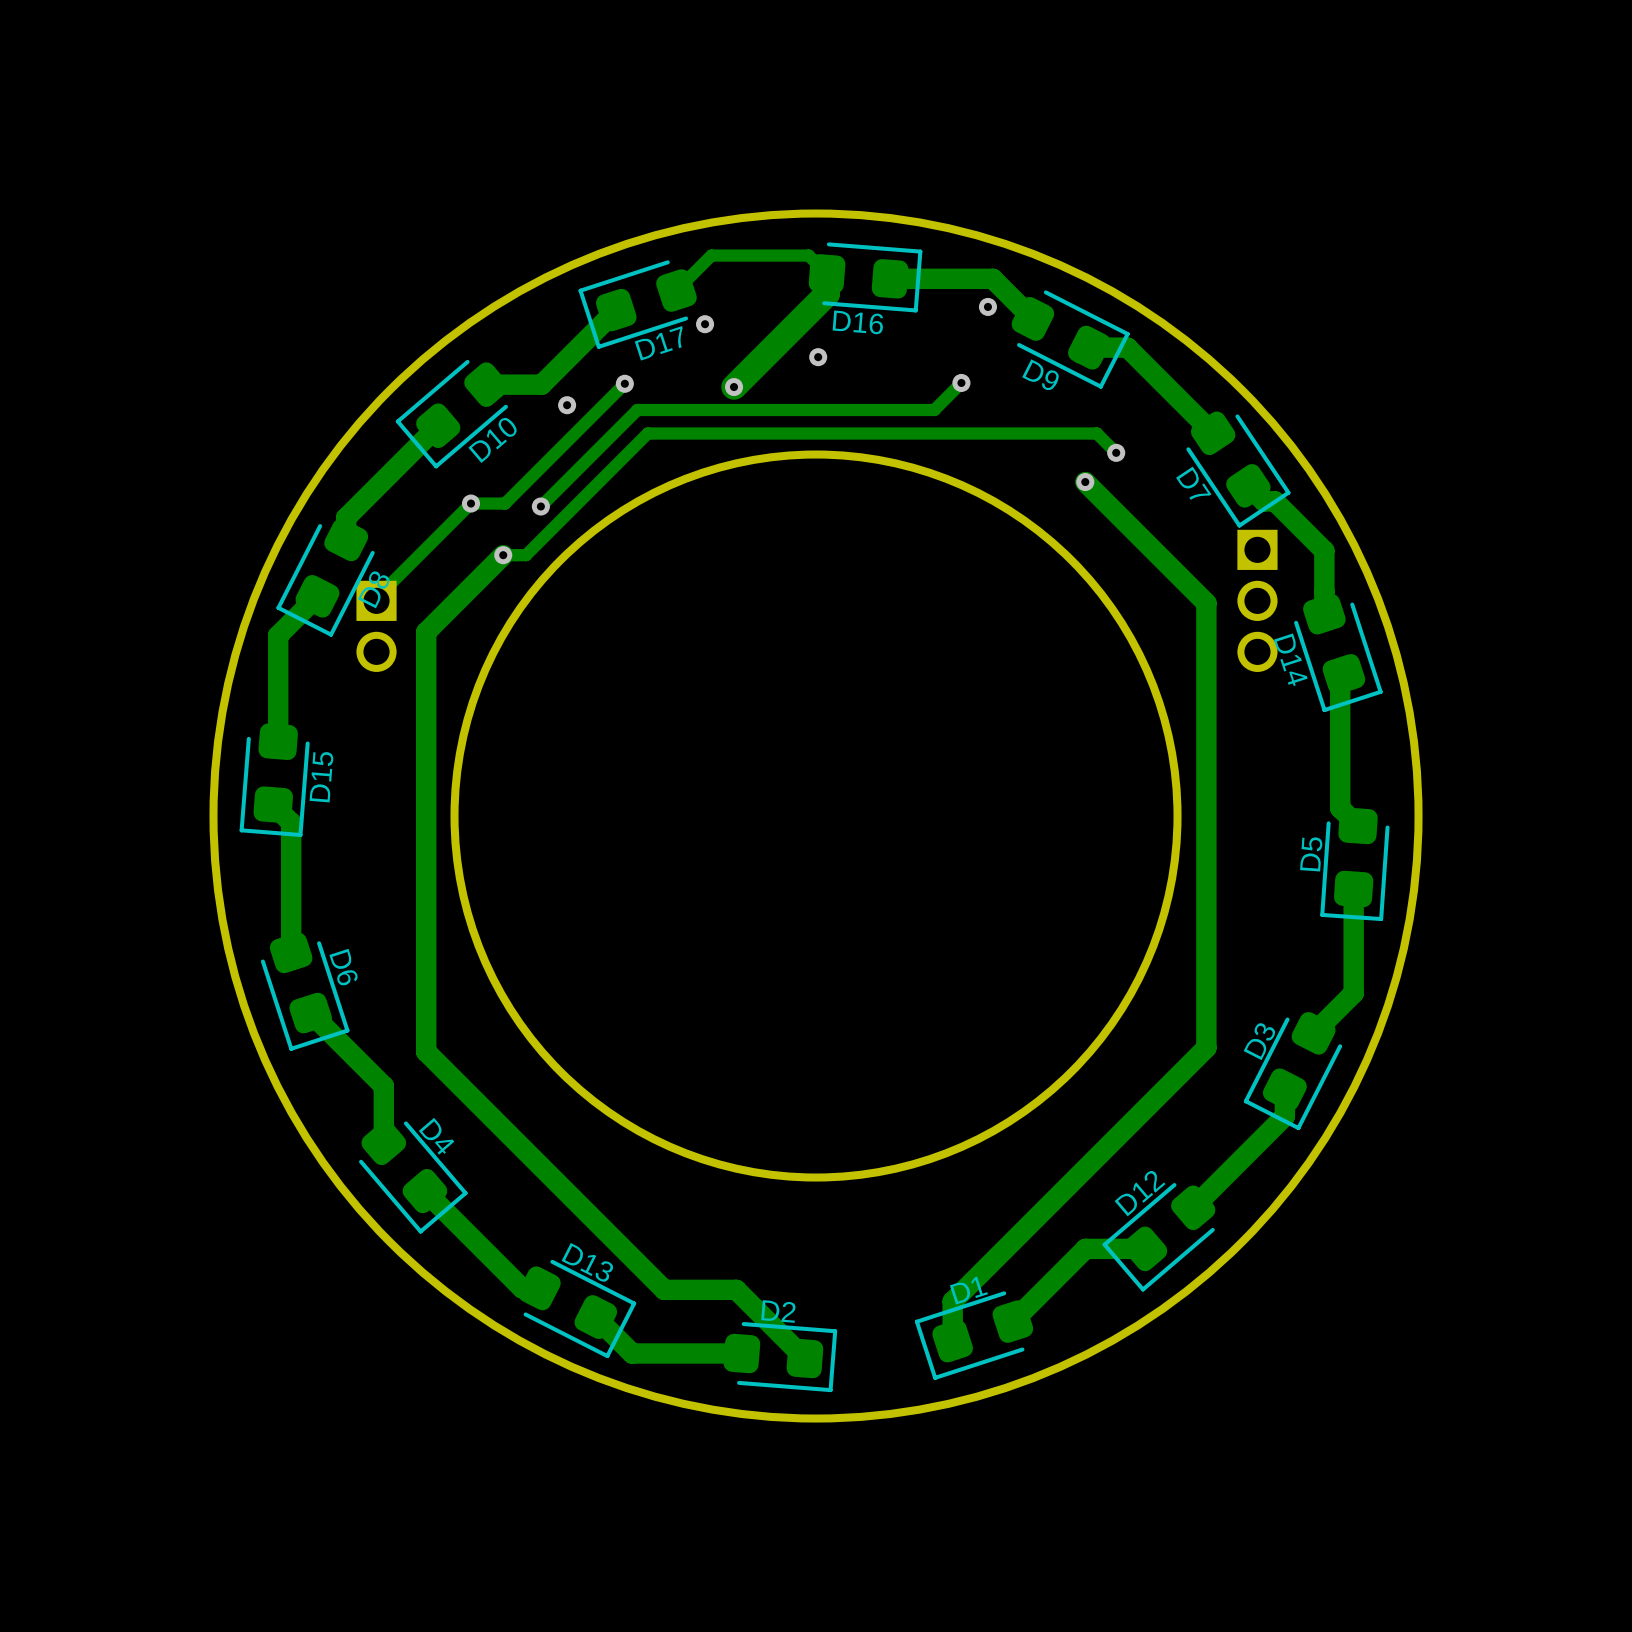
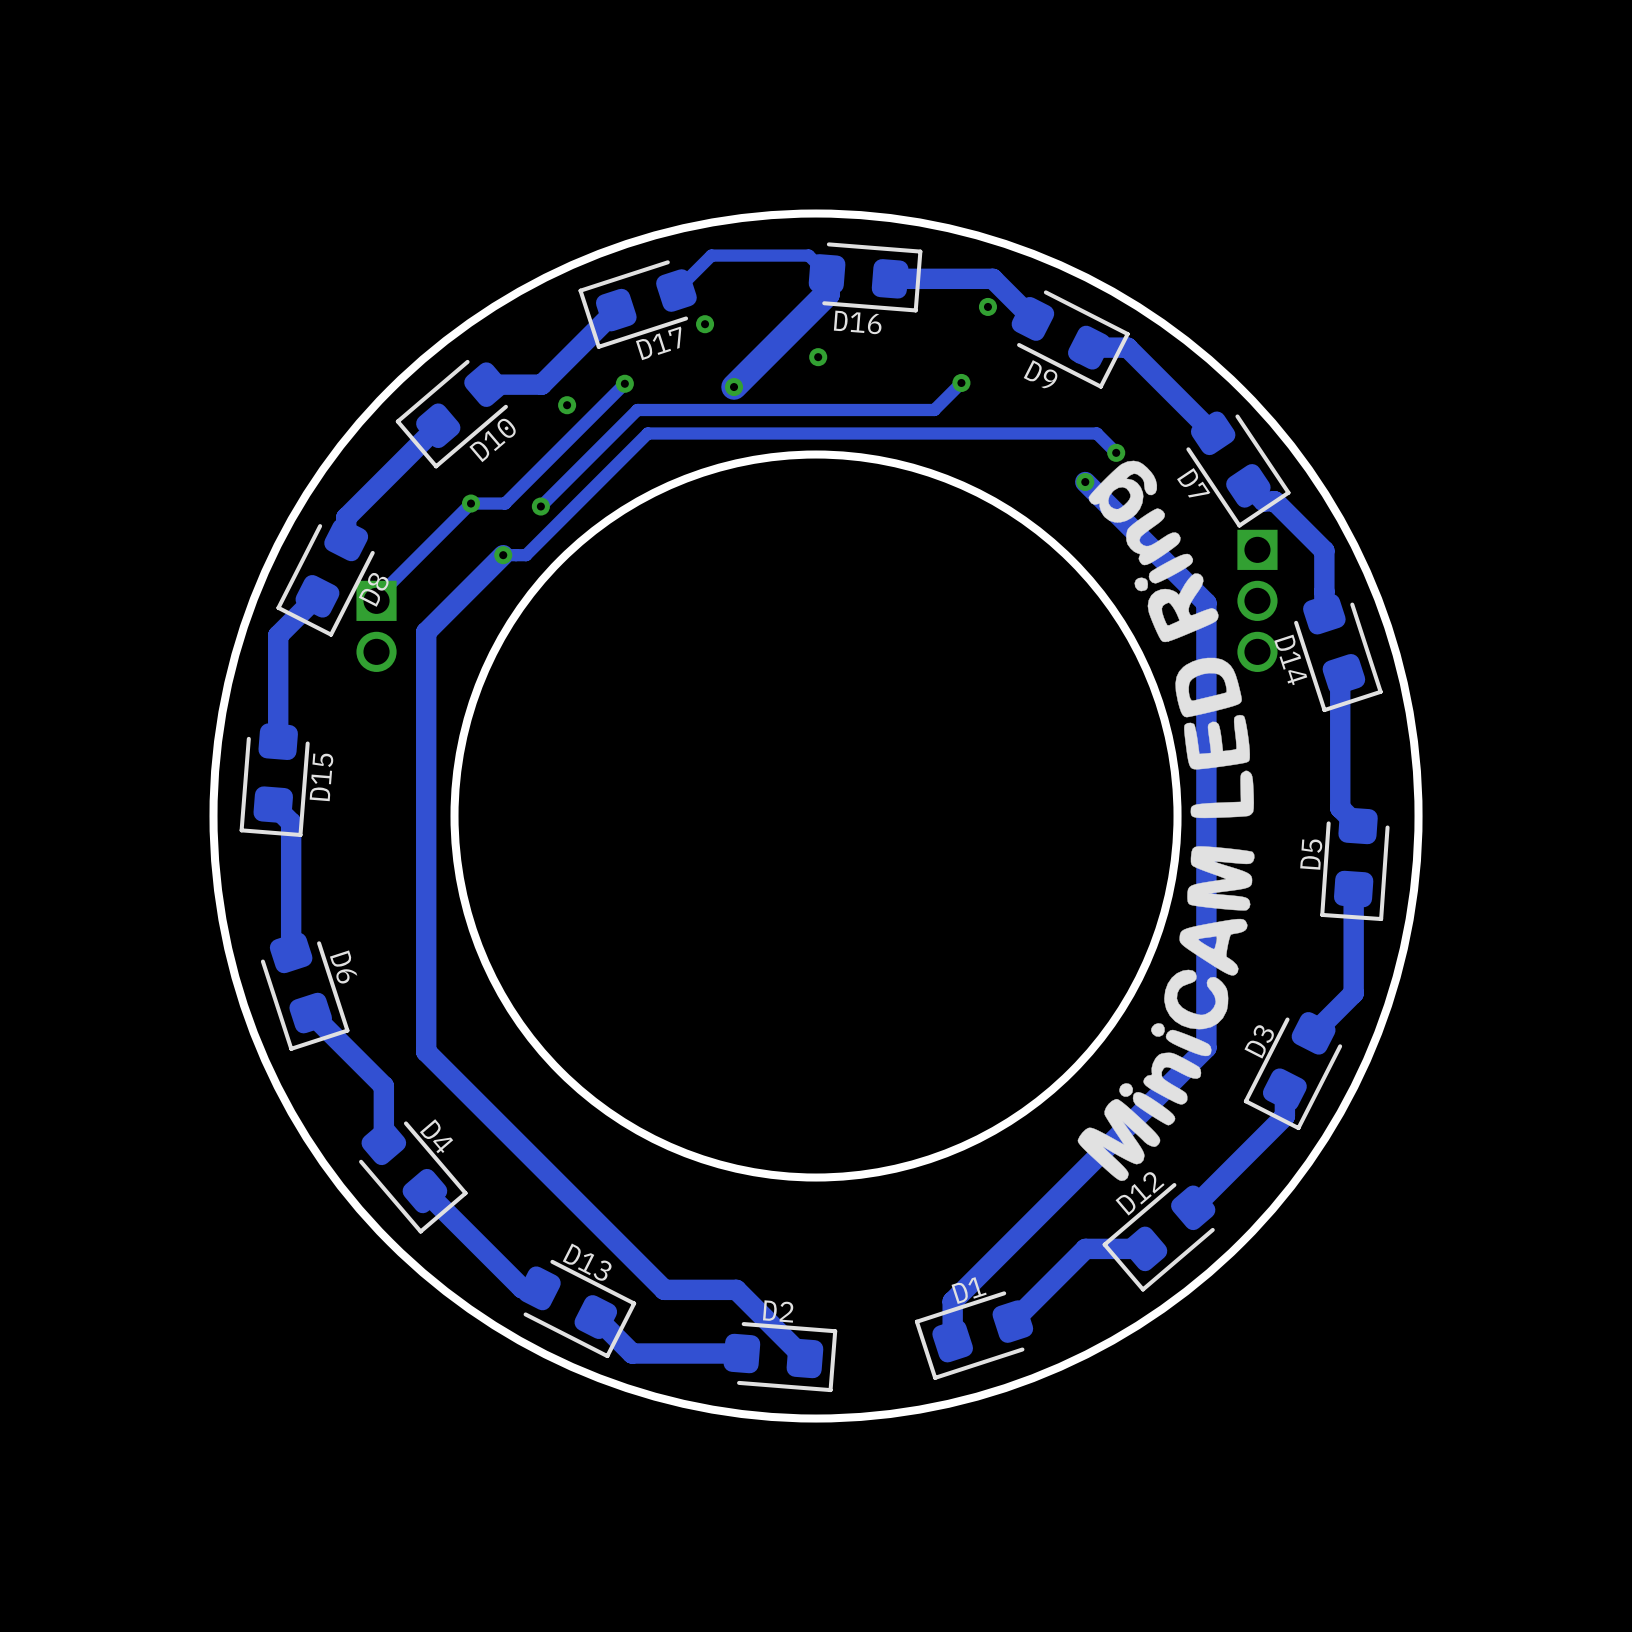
drawing: none -> [1077, 460, 1255, 1181]

